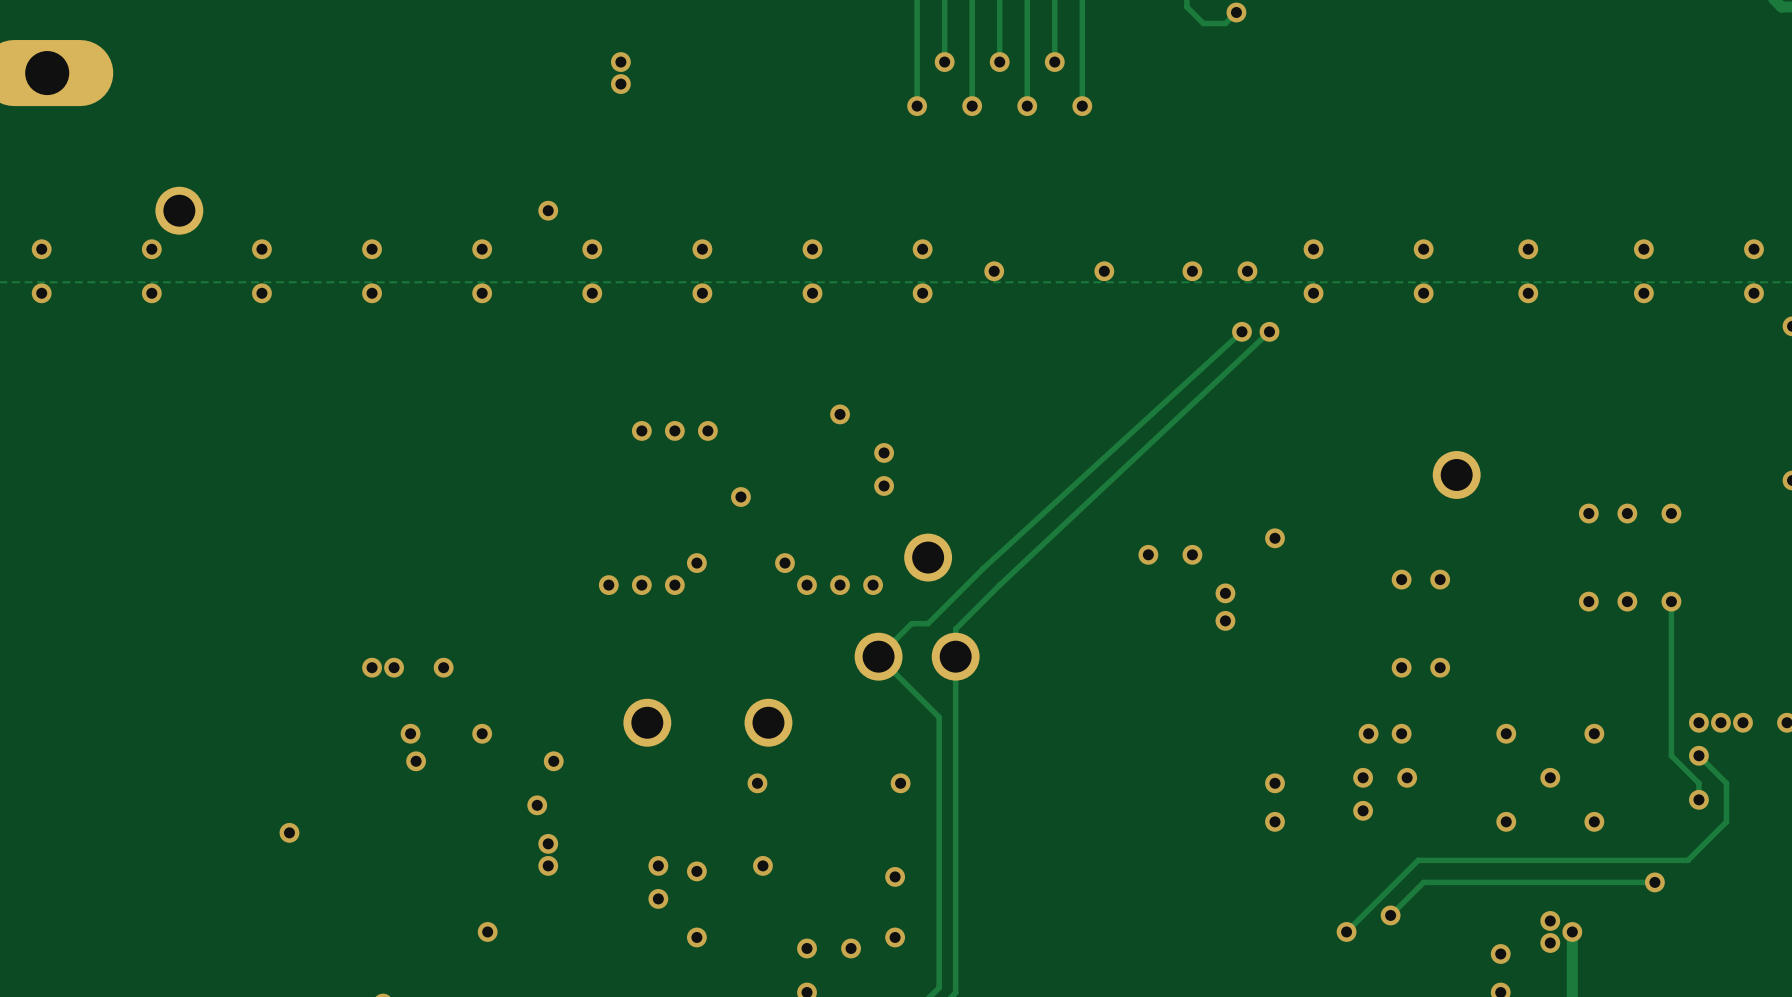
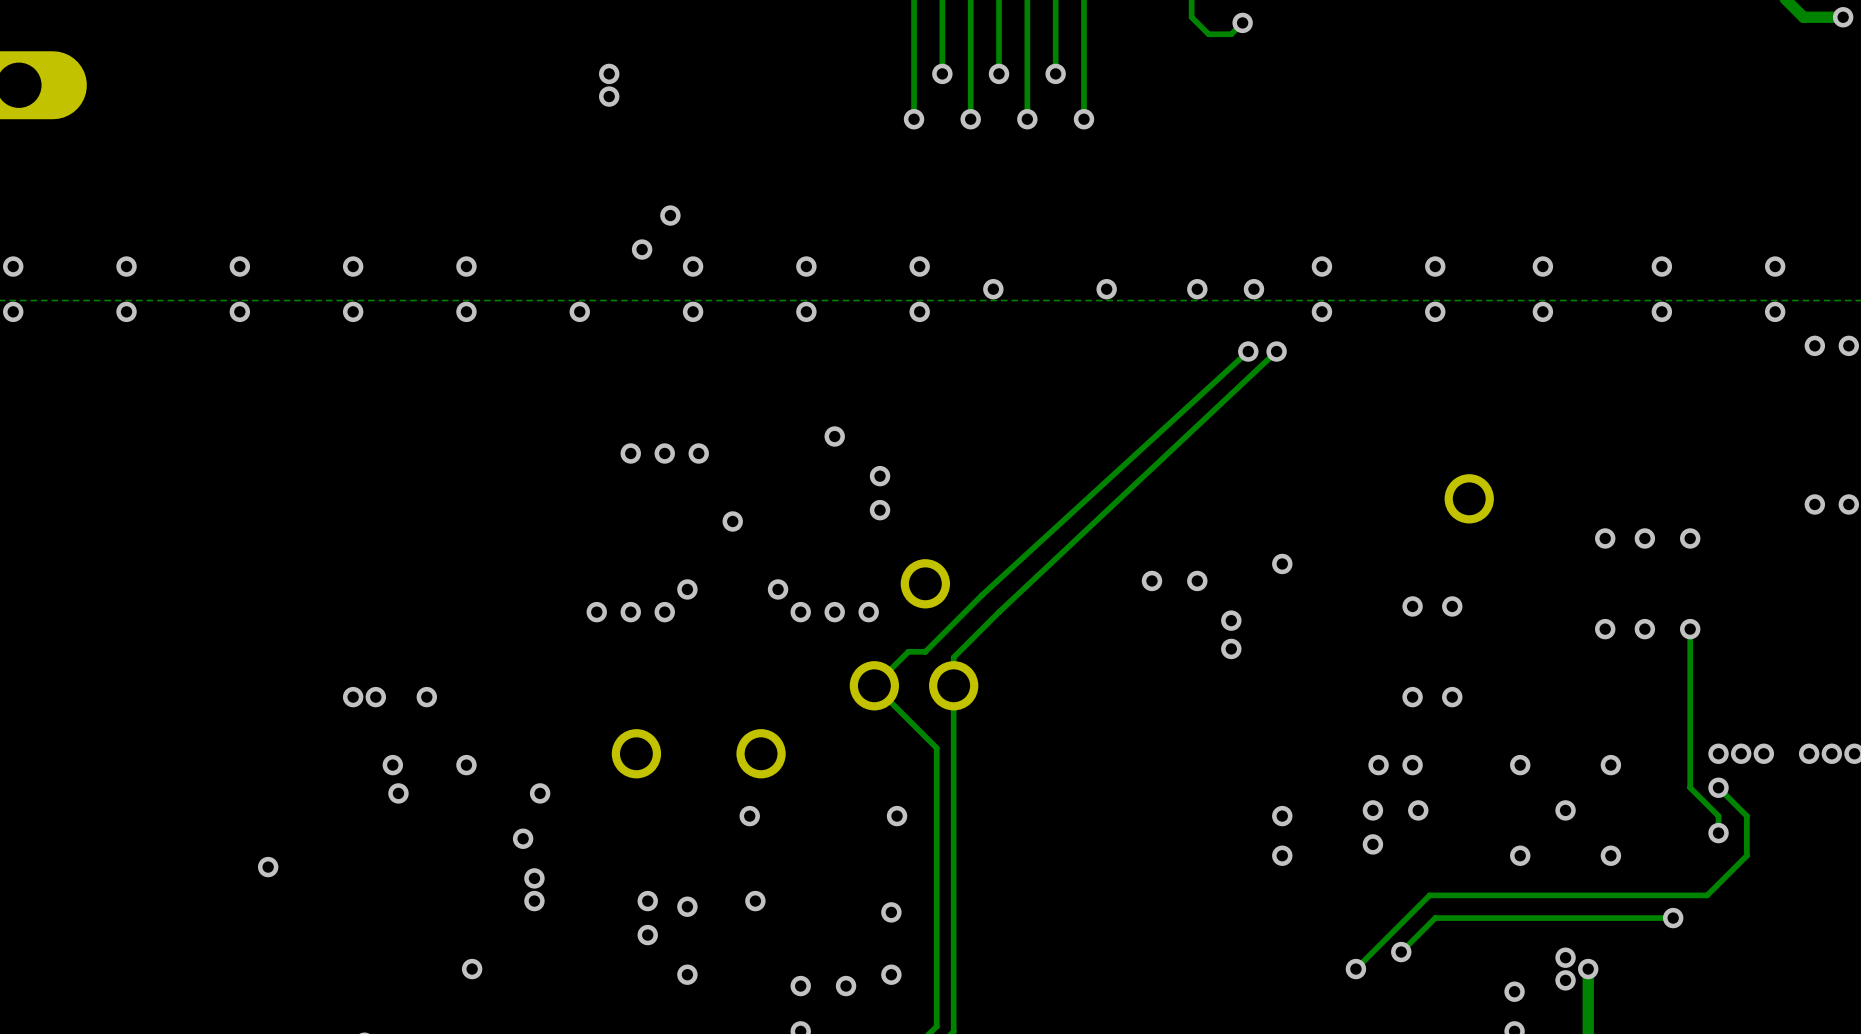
via: none -> (670, 215)
part: (179, 210) -> none
via: (548, 210) -> none
via: none -> (642, 249)
via: (592, 249) -> none

